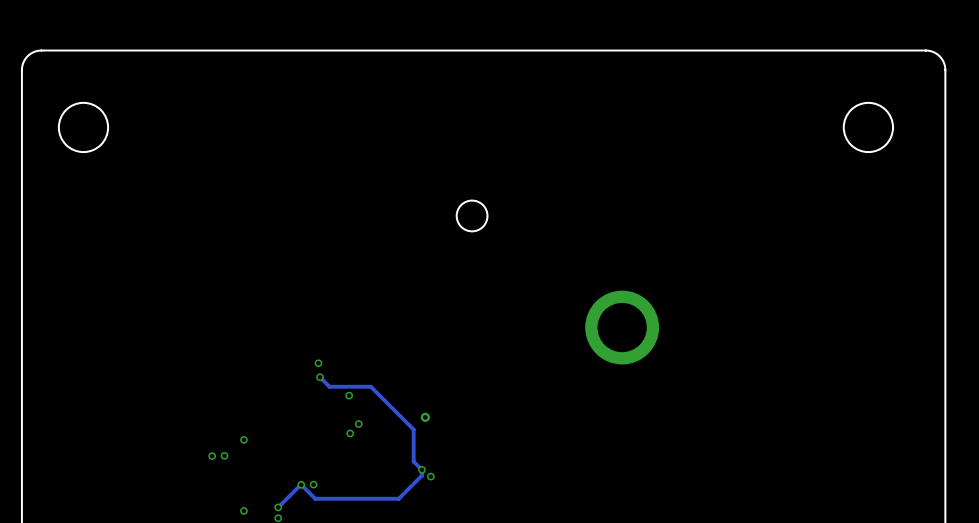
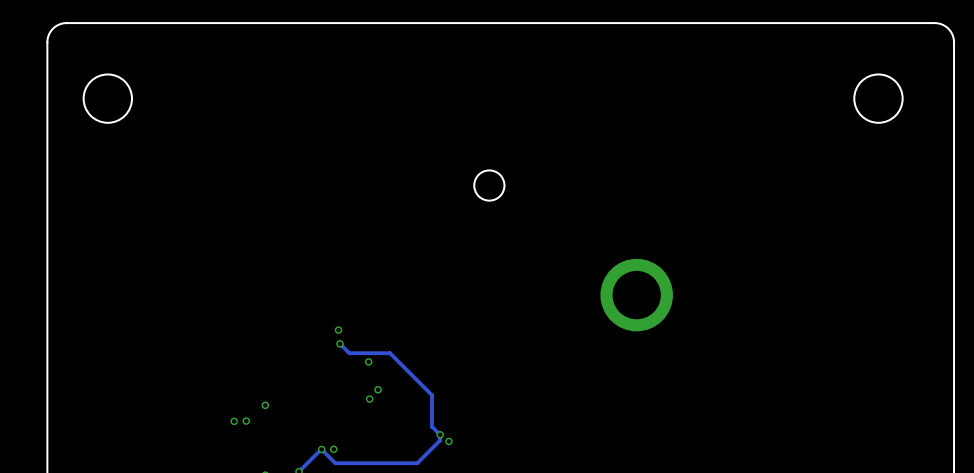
via: (425, 417) -> none

